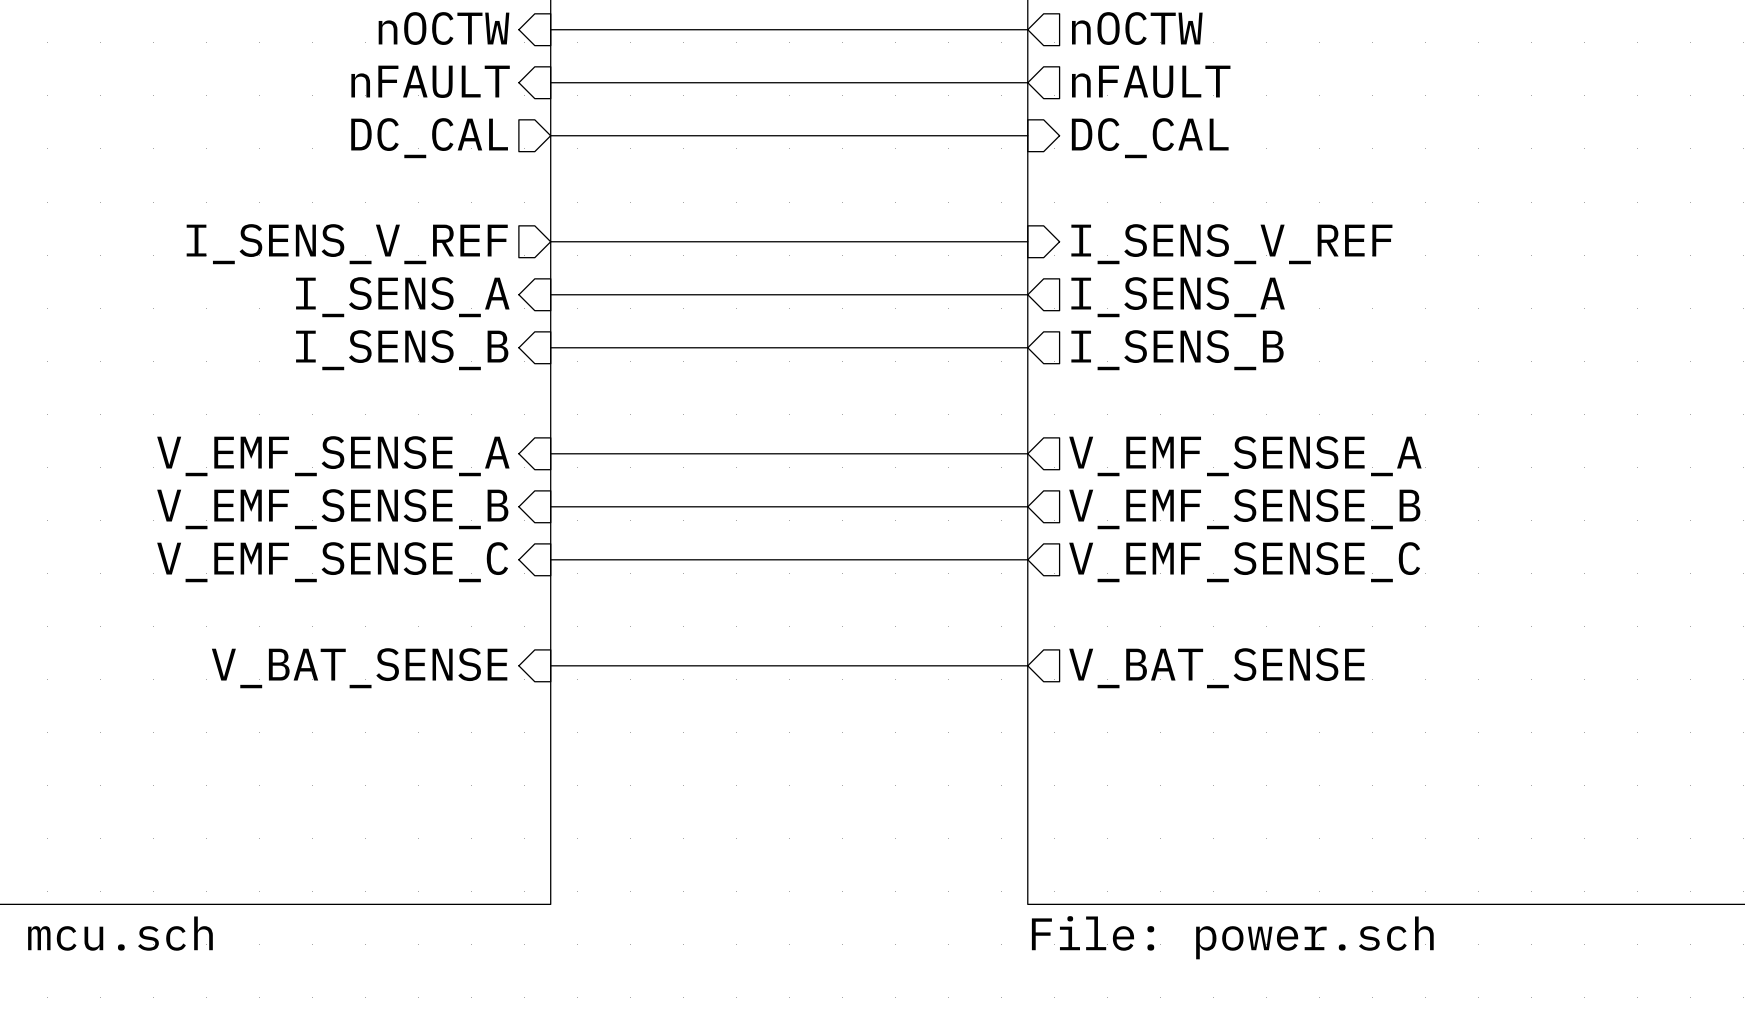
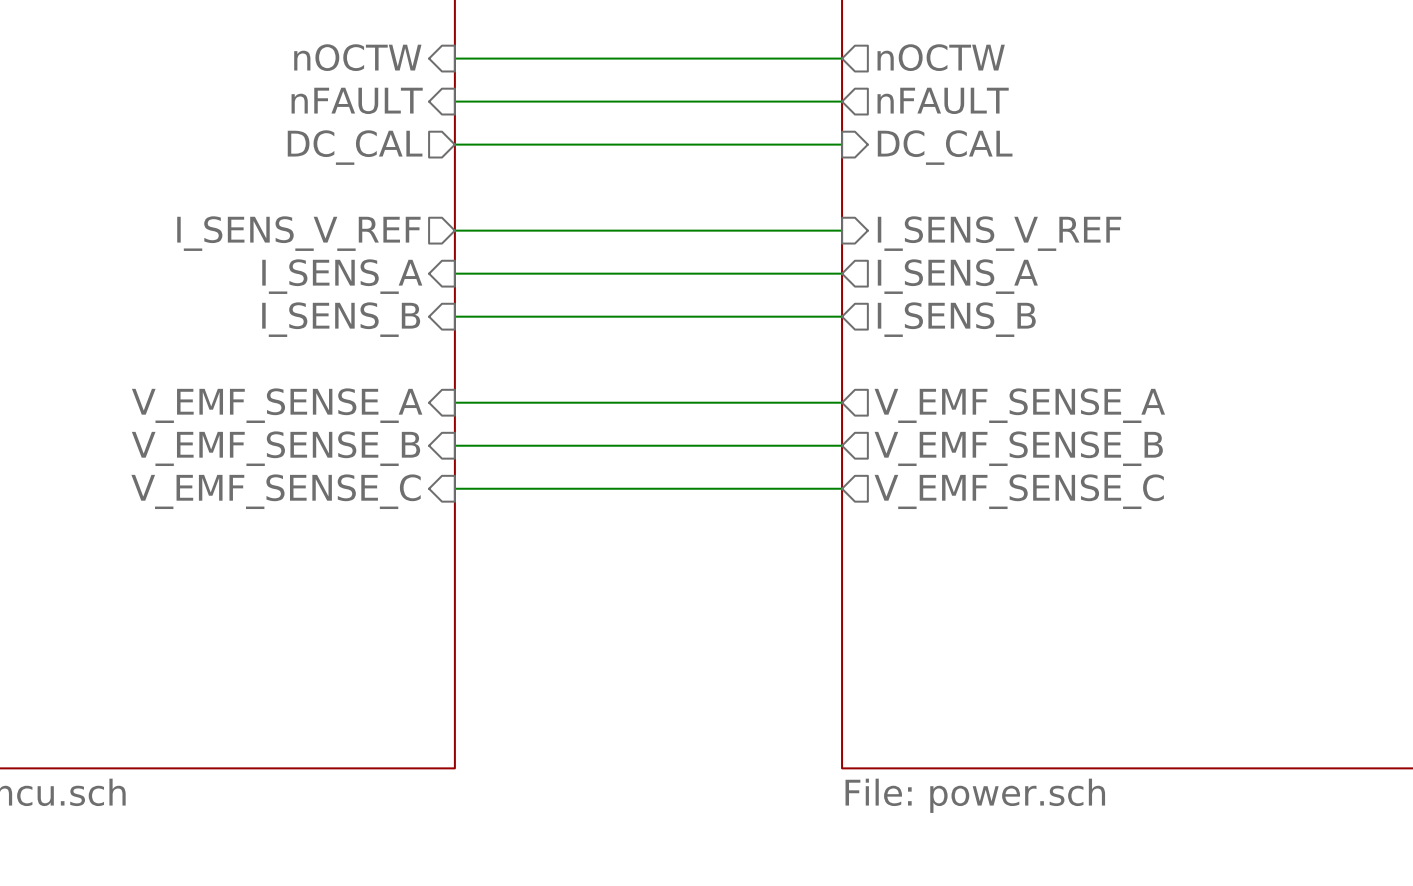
wire: (550, 665) (1027, 665) -> none
sheet pin: V_BAT_SENSE (359, 668) -> none
sheet pin: V_BAT_SENSE (1216, 668) -> none

